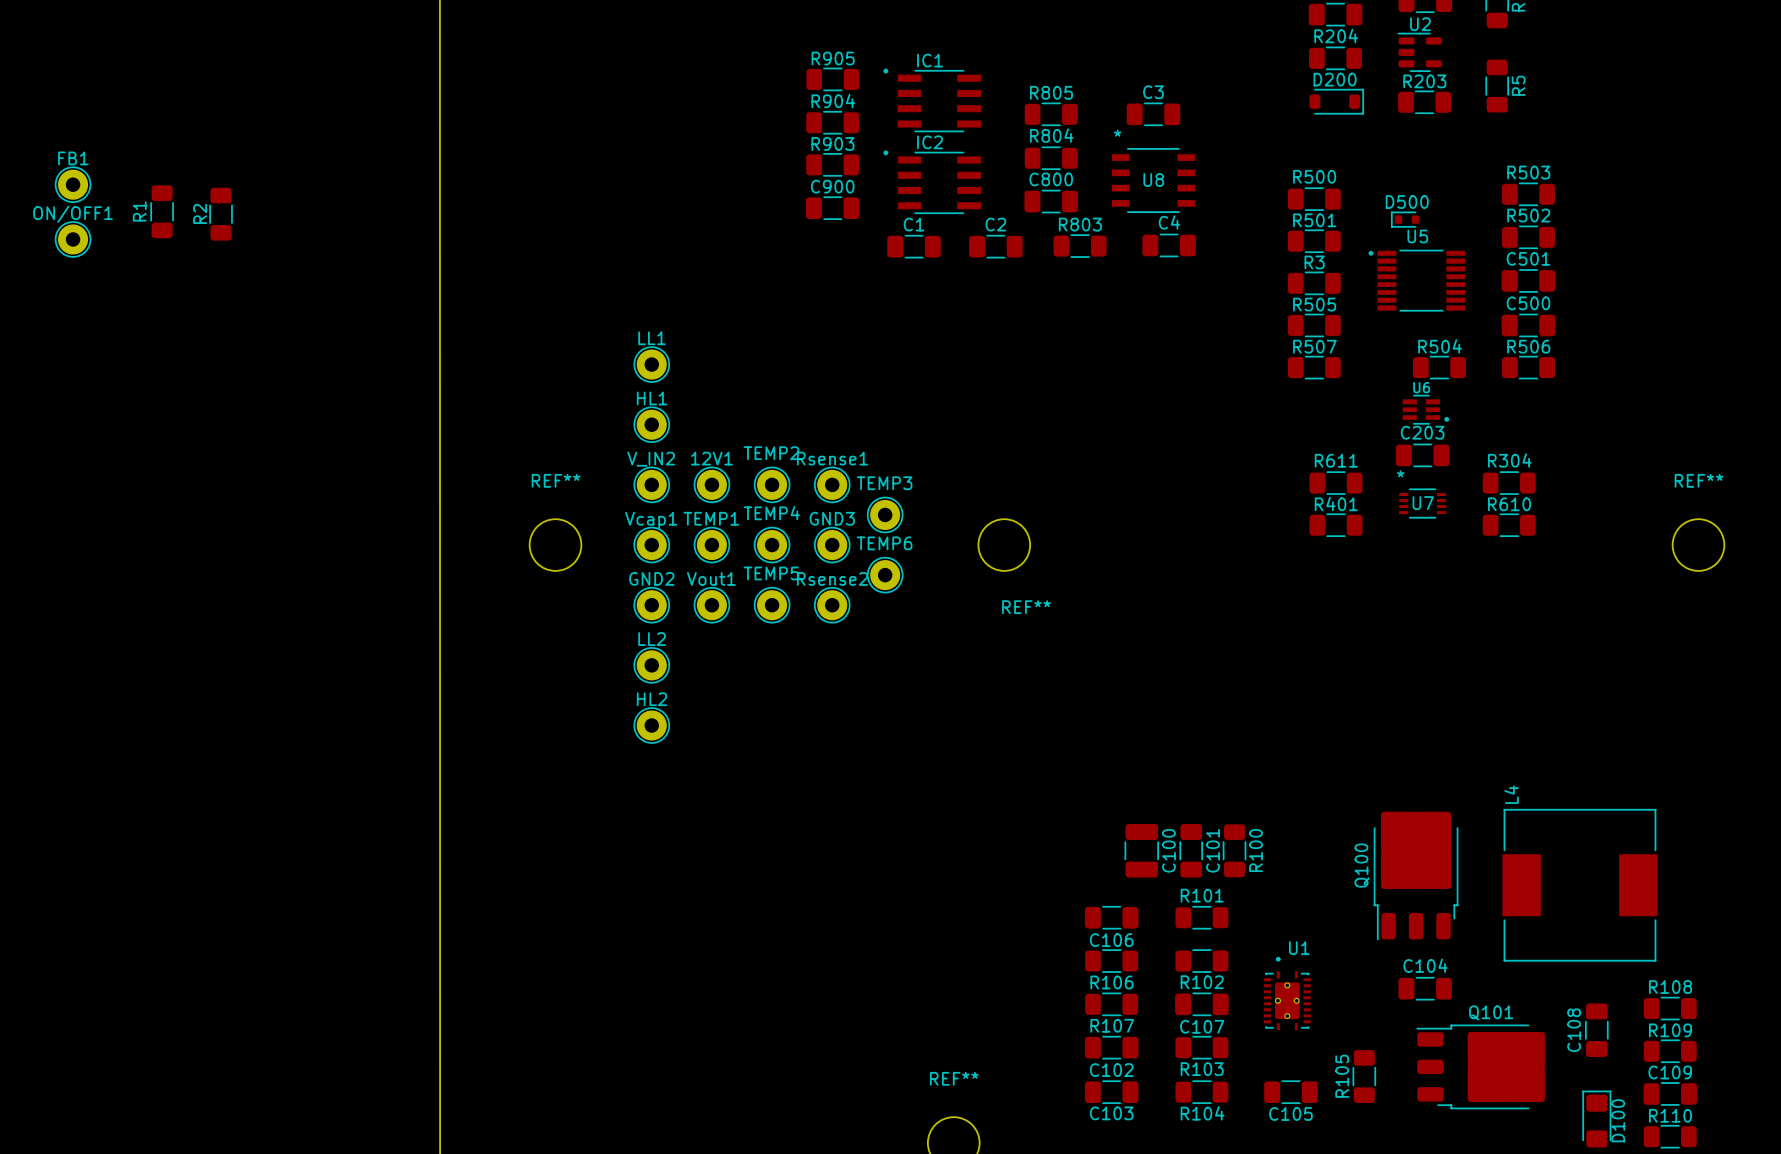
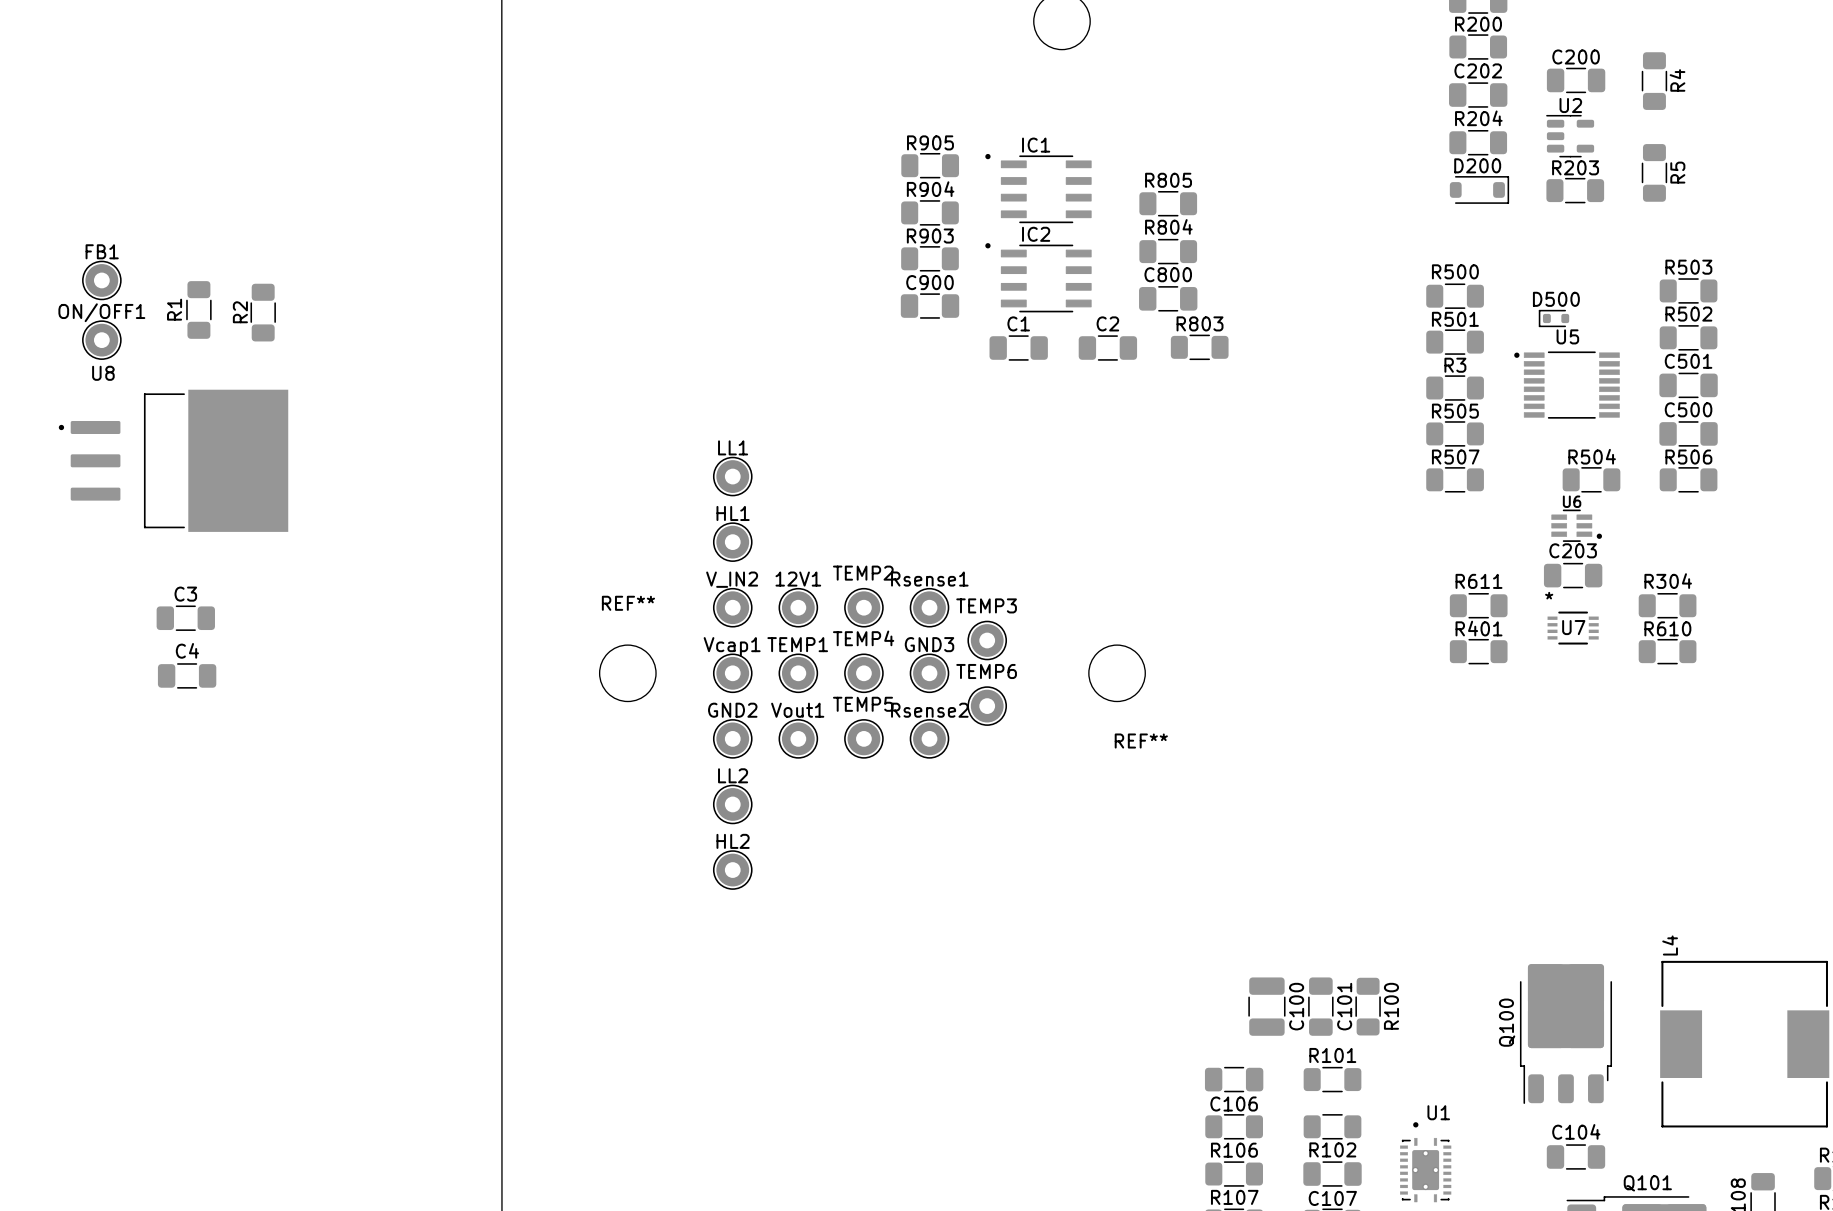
C3 position: (1153, 114) -> (185, 618)
U8 footprint: [1111, 147, 1195, 214] -> [58, 389, 289, 532]
U8 name position: U8 (1153, 180) -> U8 (103, 373)
C4 position: (1169, 245) -> (187, 675)

